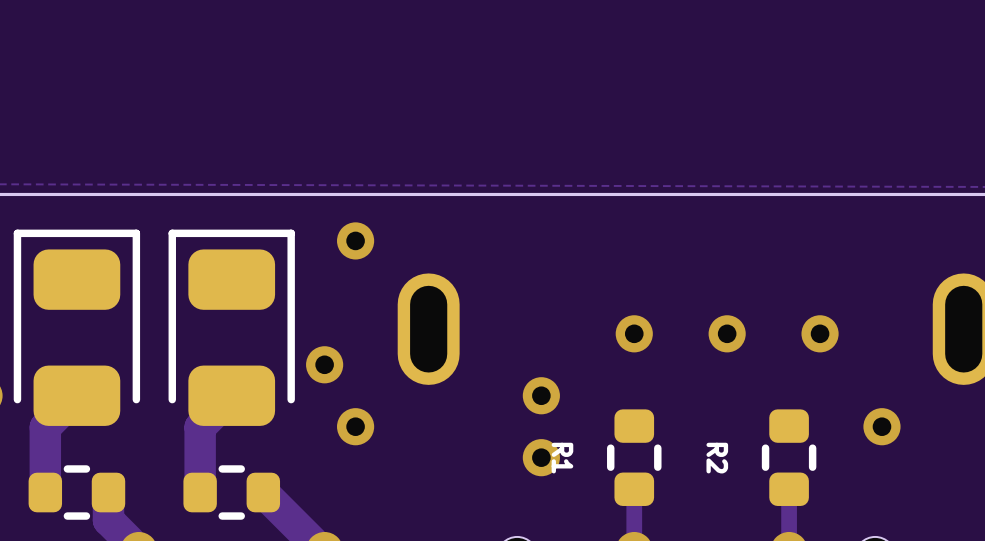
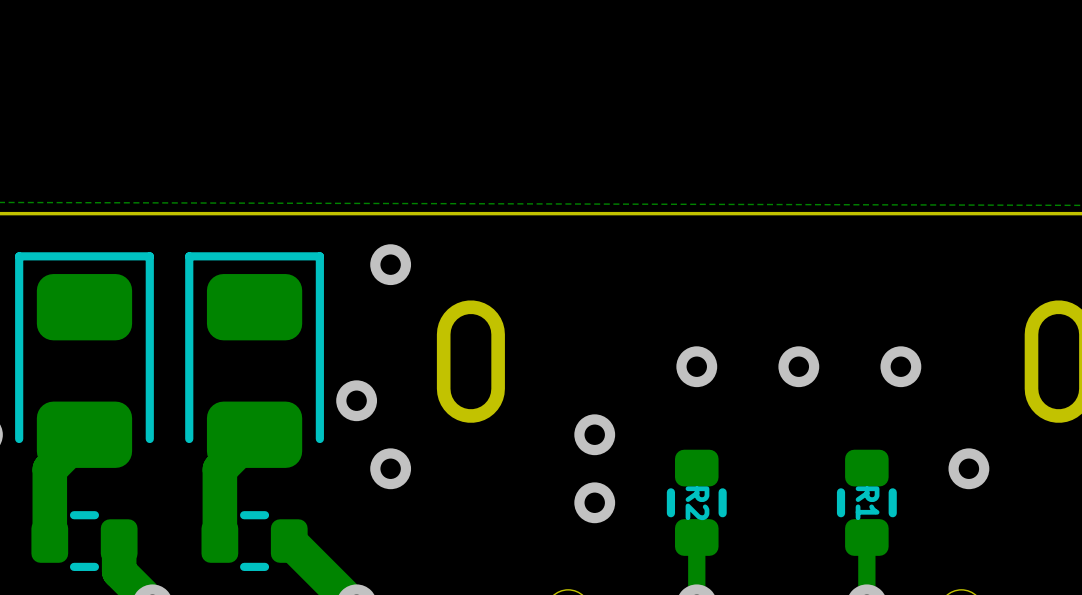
R1 name position: R1 (562, 458) -> R1 (867, 503)
R2 name position: R2 (717, 458) -> R2 (697, 503)

